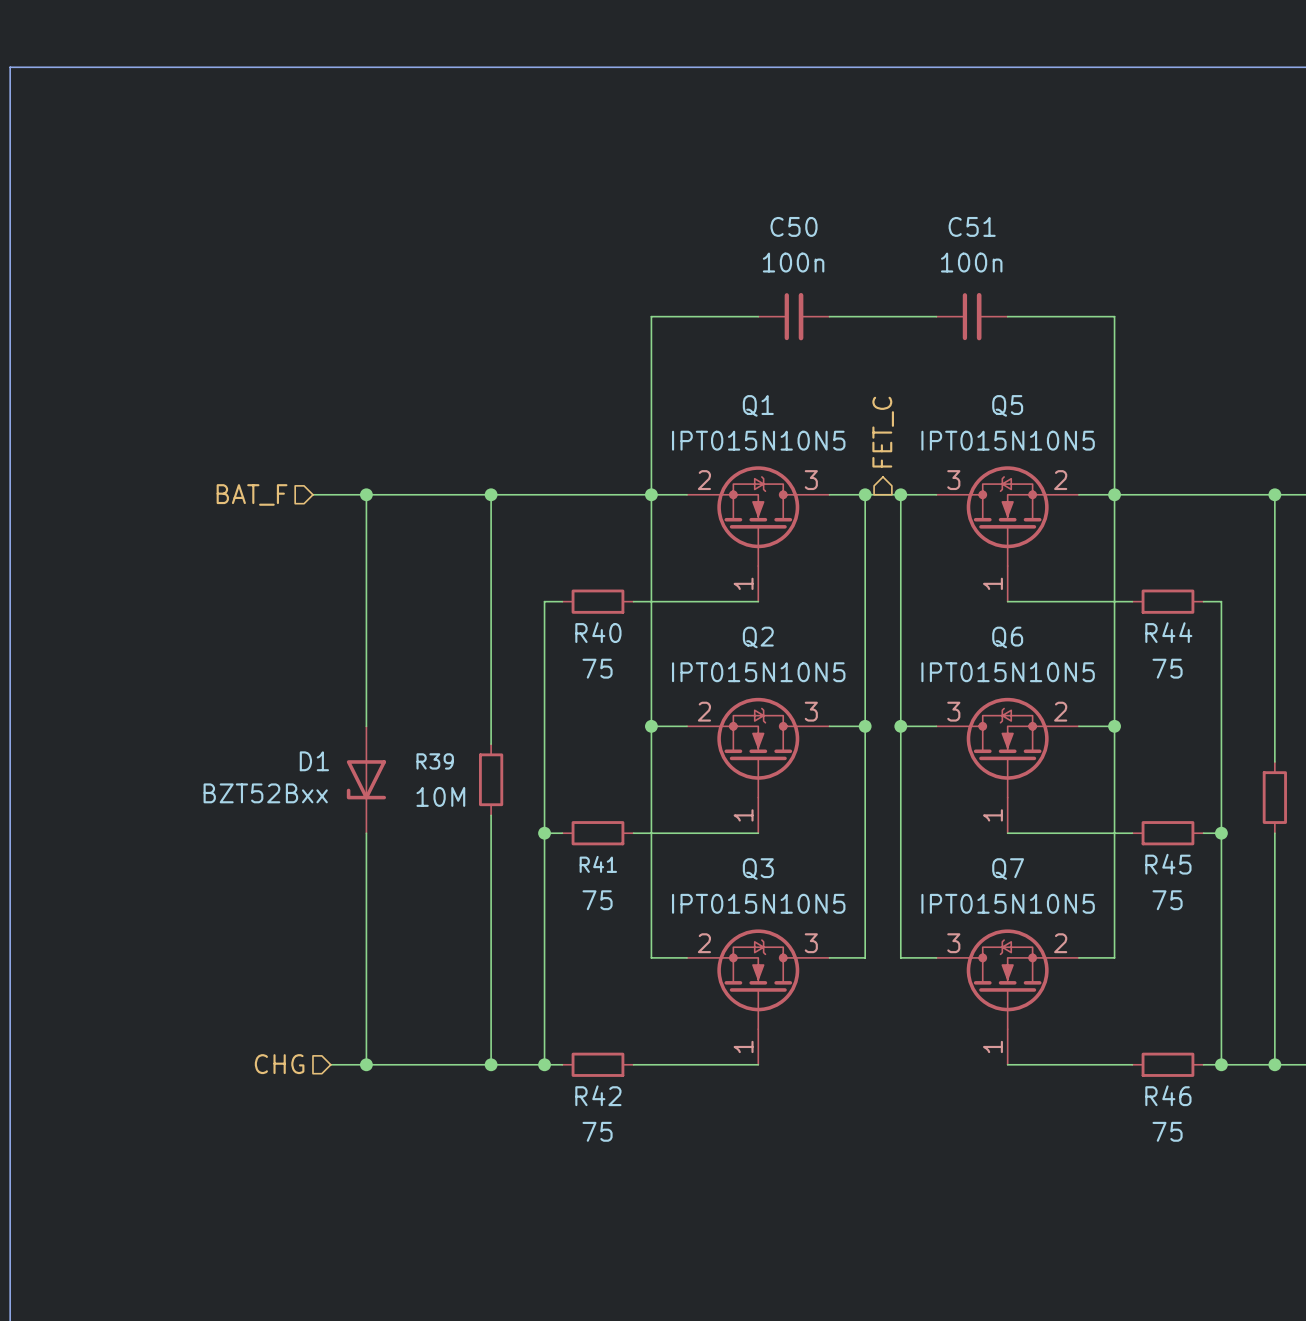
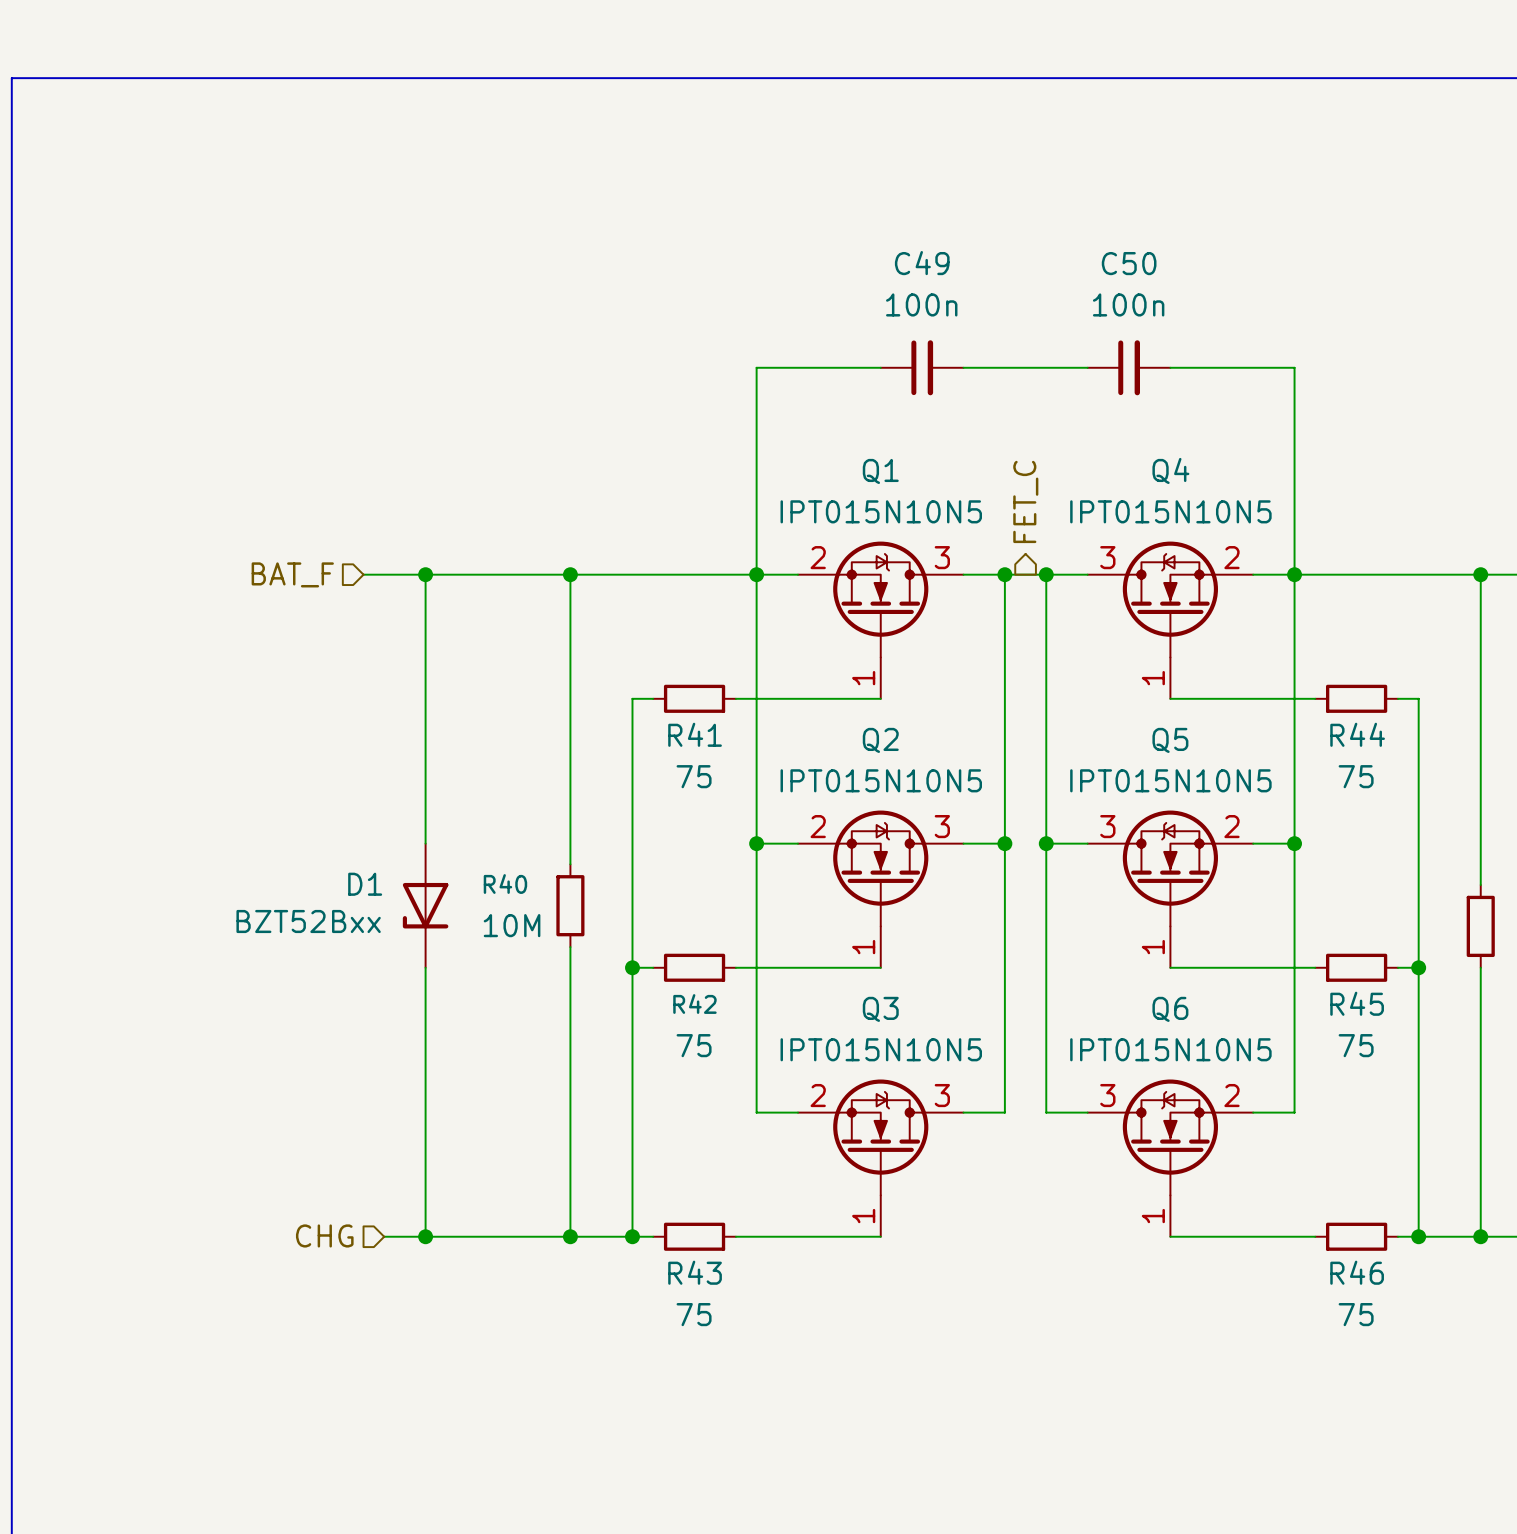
C50 name: C50 (794, 226) -> C49 (922, 263)
C51 name: C51 (972, 226) -> C50 (1129, 263)
Q5 name: Q5 (1007, 405) -> Q4 (1170, 470)
R40 name: R40 (598, 632) -> R41 (695, 734)
Q6 name: Q6 (1007, 637) -> Q5 (1170, 740)
R39 name: R39 (435, 761) -> R40 (505, 884)
R41 name: R41 (598, 864) -> R42 (694, 1004)
Q7 name: Q7 (1008, 869) -> Q6 (1170, 1009)
R42 name: R42 (598, 1095) -> R43 (695, 1272)

